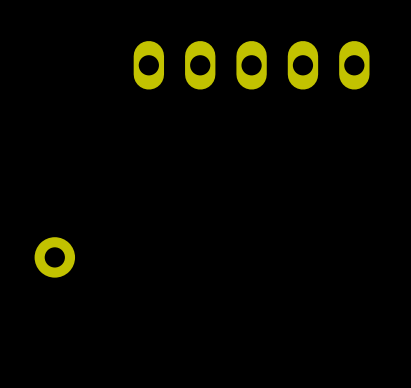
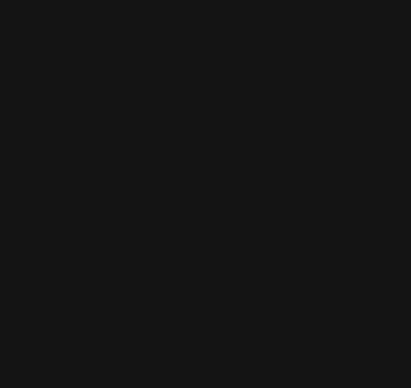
part: (251, 65) -> none
part: (54, 257) -> none

